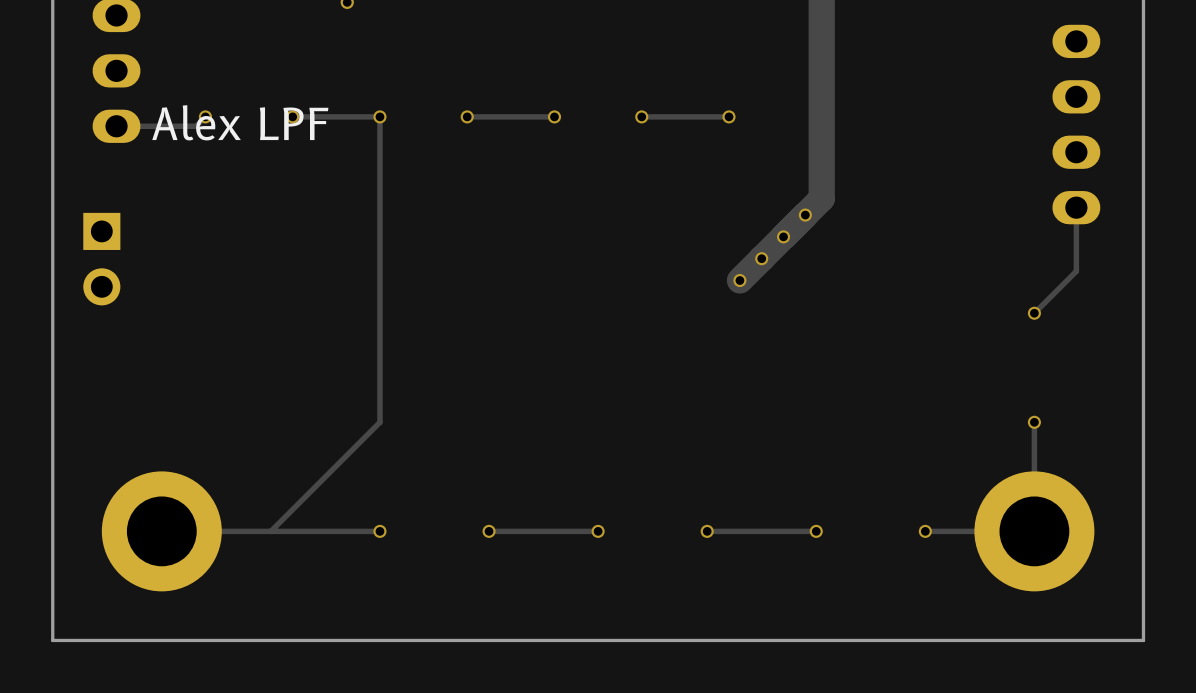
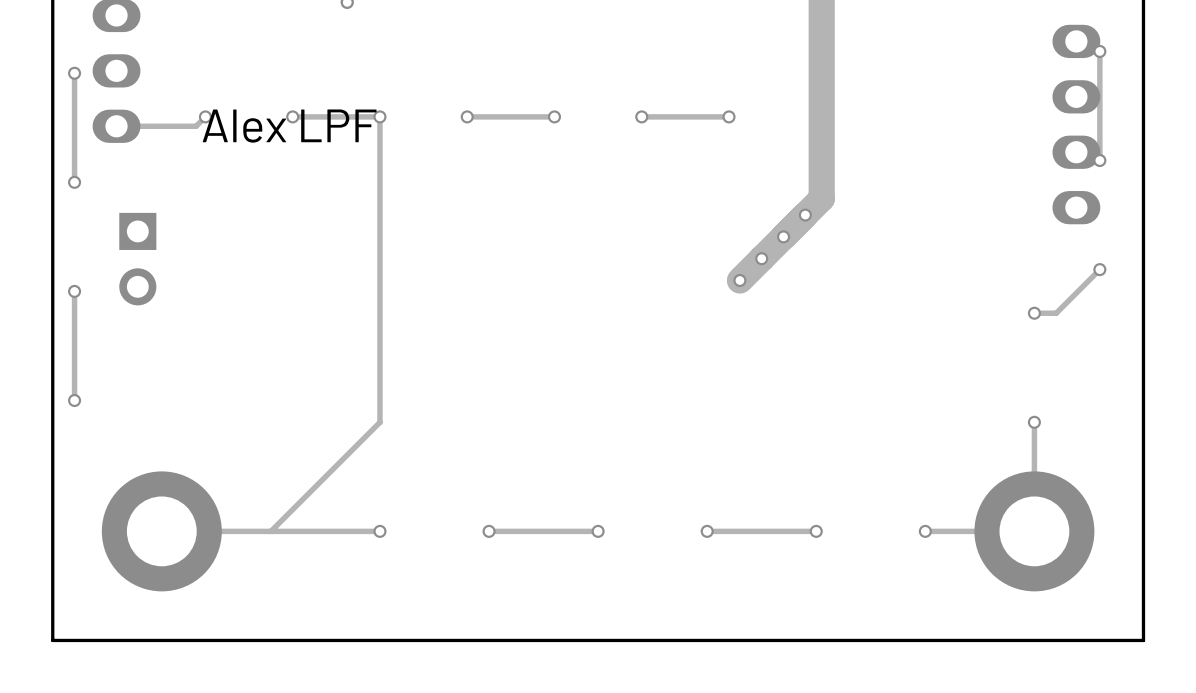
track: none -> (1099, 51) (1099, 160)
via: none -> (1099, 51)
track: none -> (74, 73) (74, 182)
via: none -> (74, 73)
text position: Alex LPF (240, 122) -> Alex LPF (289, 126)
via: none -> (1099, 160)
via: none -> (74, 182)
track: (1076, 207) (1076, 271) (1034, 313) -> (1099, 269) (1056, 313) (1034, 313)
part position: (101, 259) -> (137, 259)
via: none -> (1099, 269)
track: none -> (74, 291) (74, 400)
via: none -> (74, 291)
via: none -> (74, 400)

